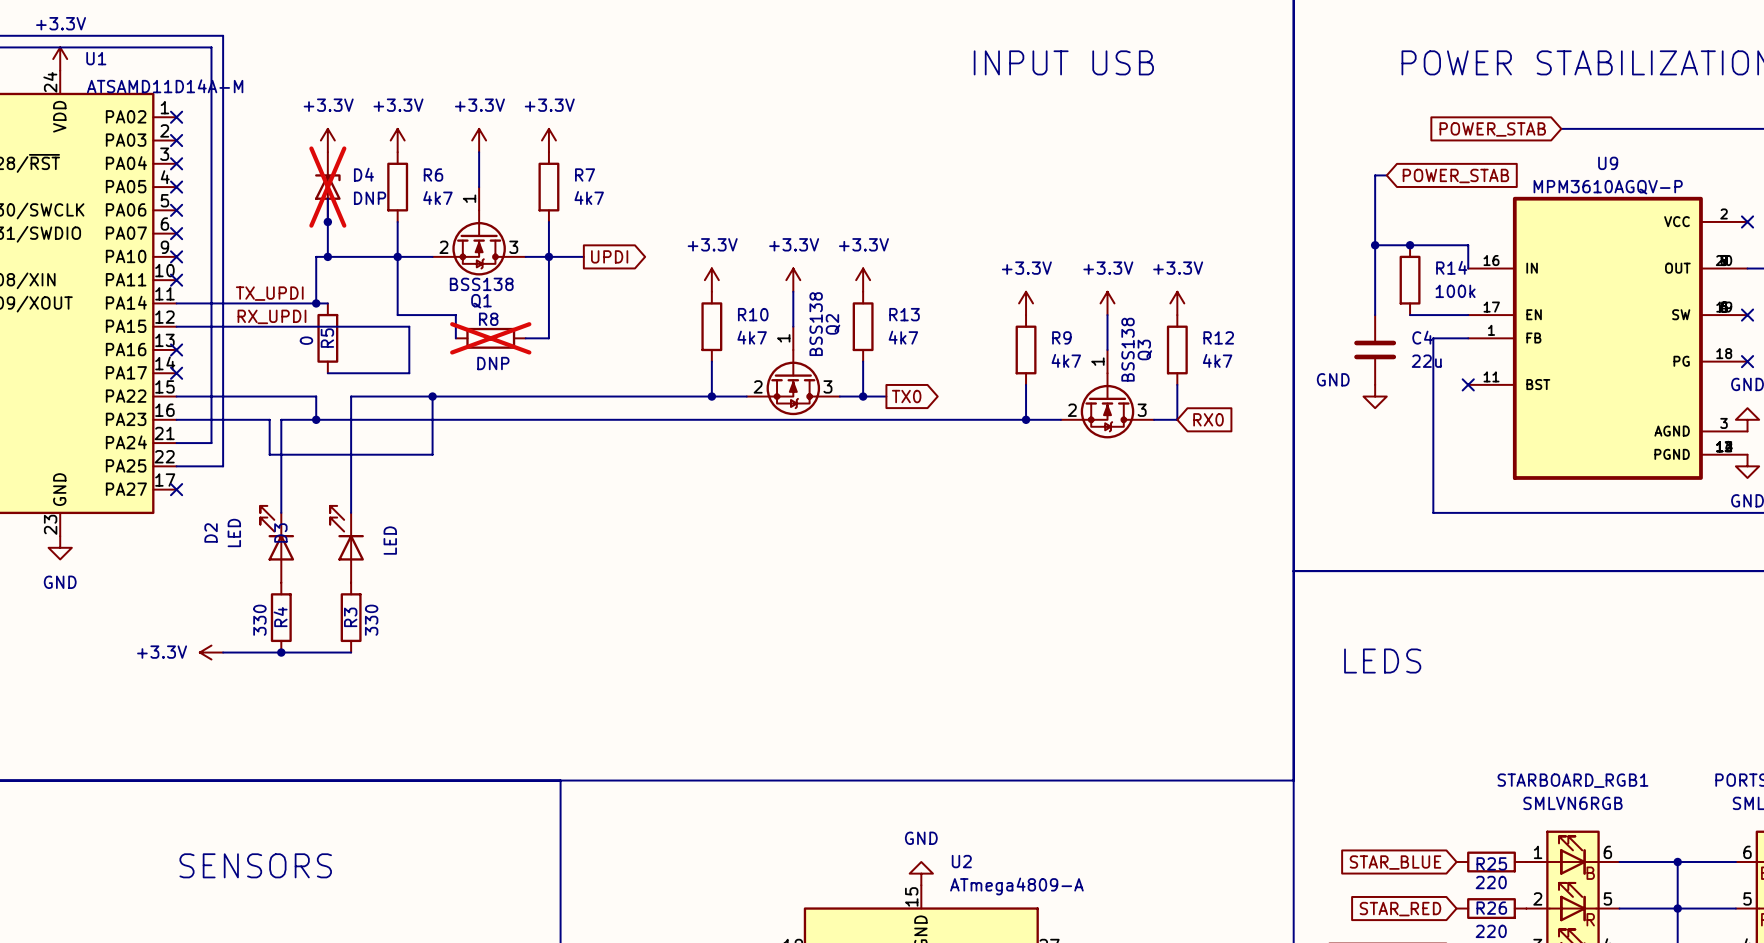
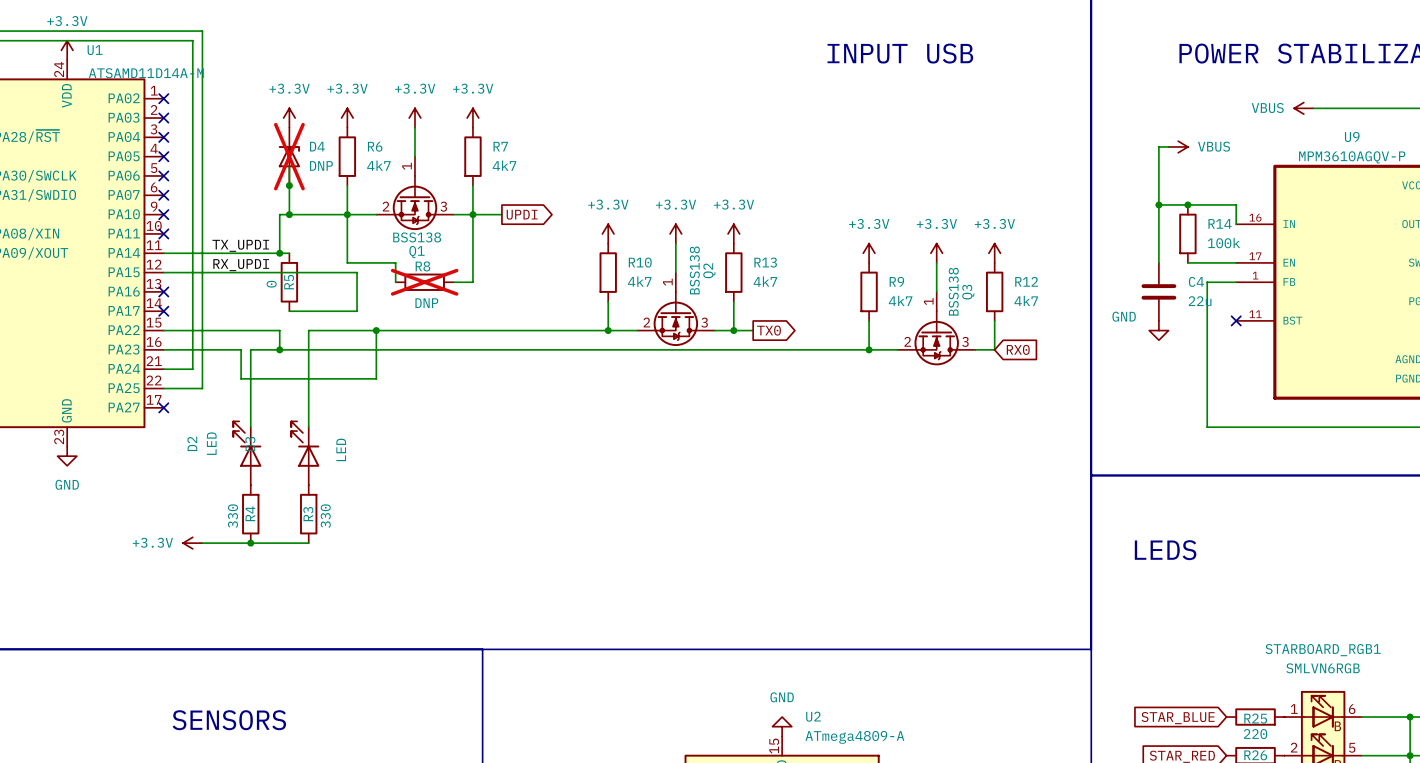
power symbol: none -> VBUS (1303, 108)
global label: POWER_STAB (1492, 129) -> none
power symbol: none -> VBUS (1178, 147)
global label: POWER_STAB (1455, 175) -> none

